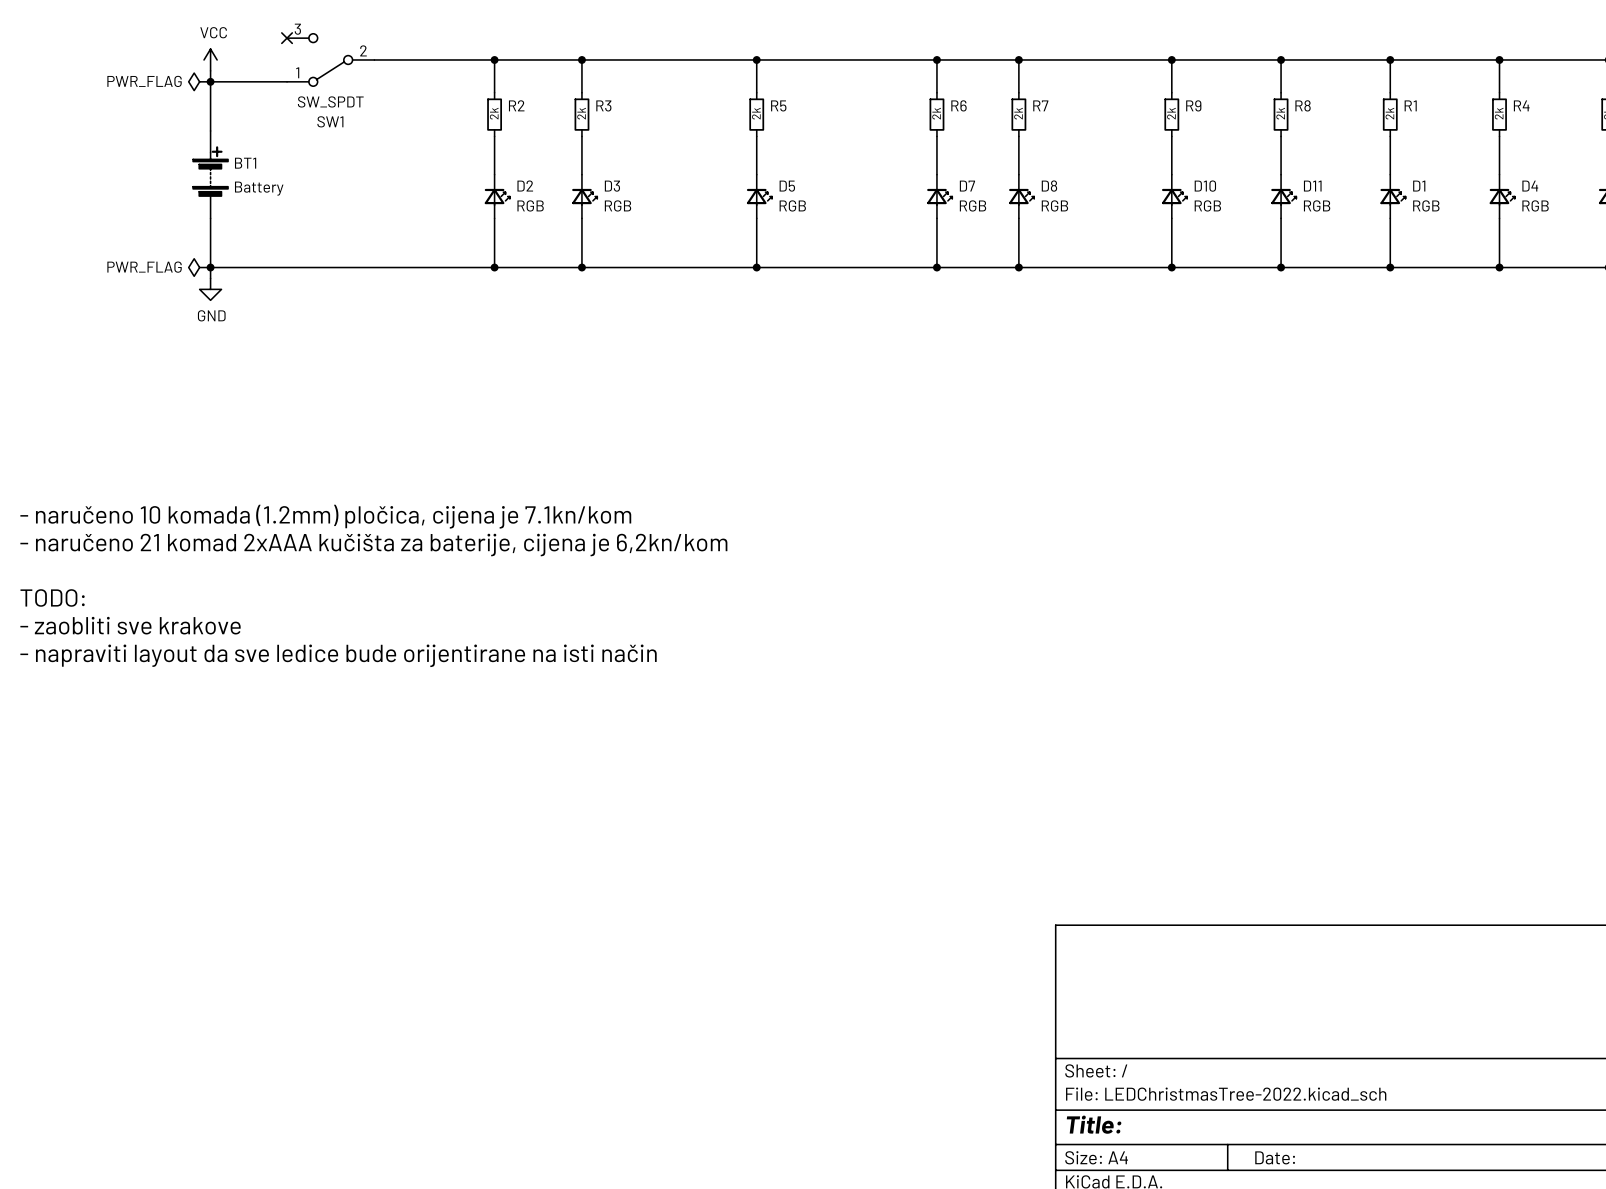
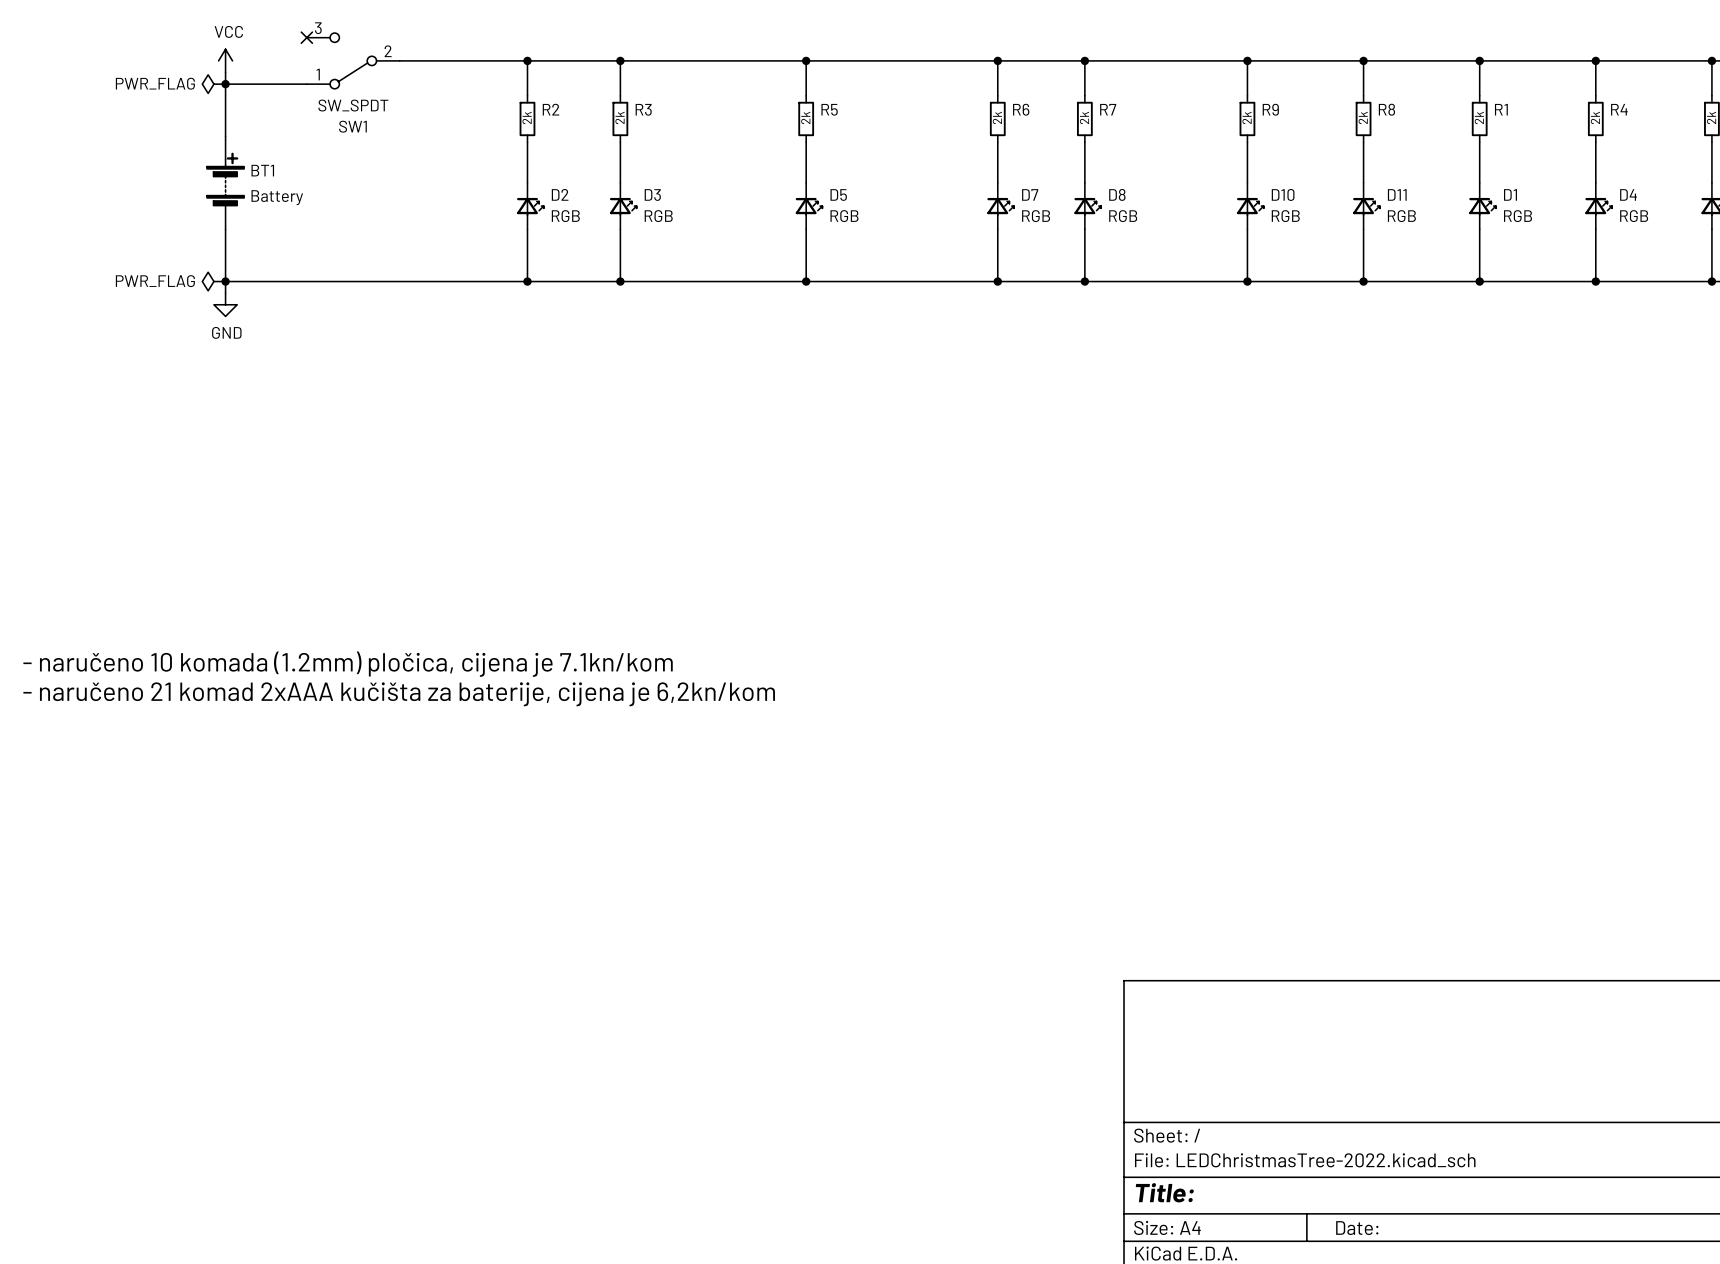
text: - naručeno 10 komada (1.2mm) pločica, cijena je 7.1kn/kom (325, 516) -> none
text: - naručeno 21 komad 2xAAA kučišta za baterije, cijena je 6,2kn/kom (373, 545) -> none
text: TODO: (52, 597) -> none
text: - zaobliti sve krakove (130, 625) -> - naručeno 10 komada (1.2mm) pločica, cijena je 7.1kn/kom (348, 664)
text: - napraviti layout da sve ledice bude orijentirane na isti način (338, 655) -> - naručeno 21 komad 2xAAA kučišta za baterije, cijena je 6,2kn/kom (399, 694)

